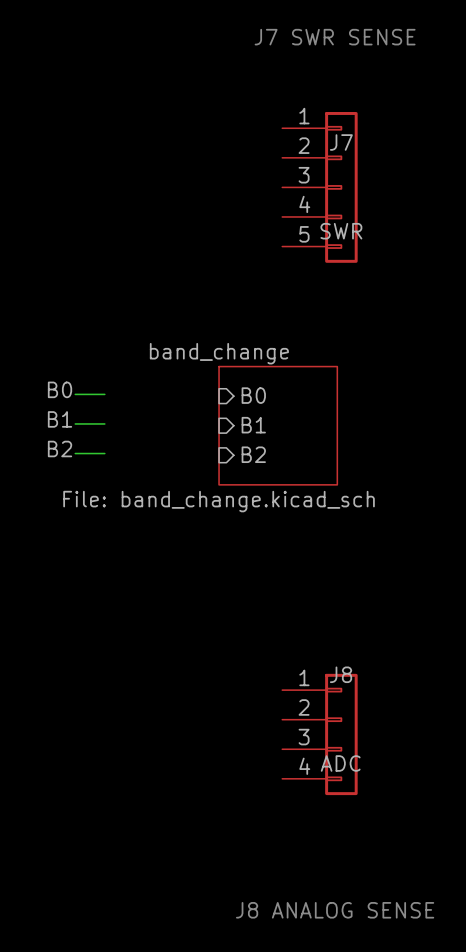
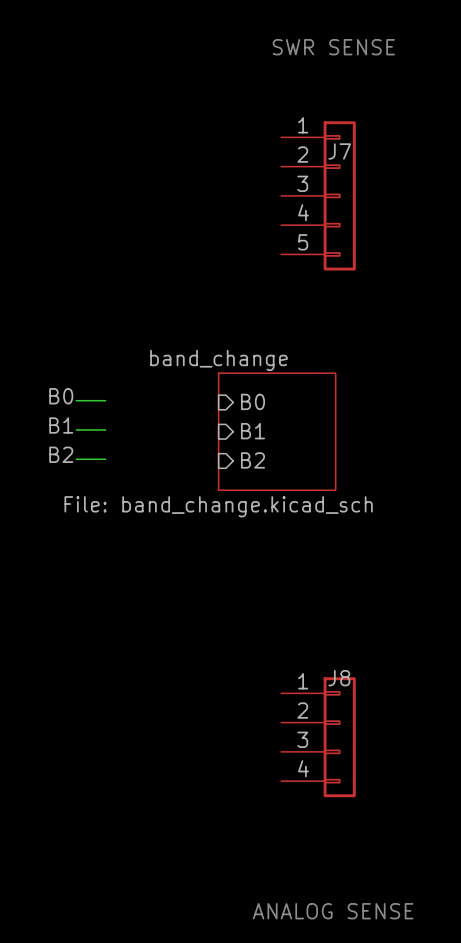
text: J7 SWR SENSE (335, 37) -> SWR SENSE (333, 47)
J7 value: SWR (341, 231) -> none
J8 value: ADC (340, 763) -> none
text: J8 ANALOG SENSE (335, 910) -> ANALOG SENSE (333, 911)

